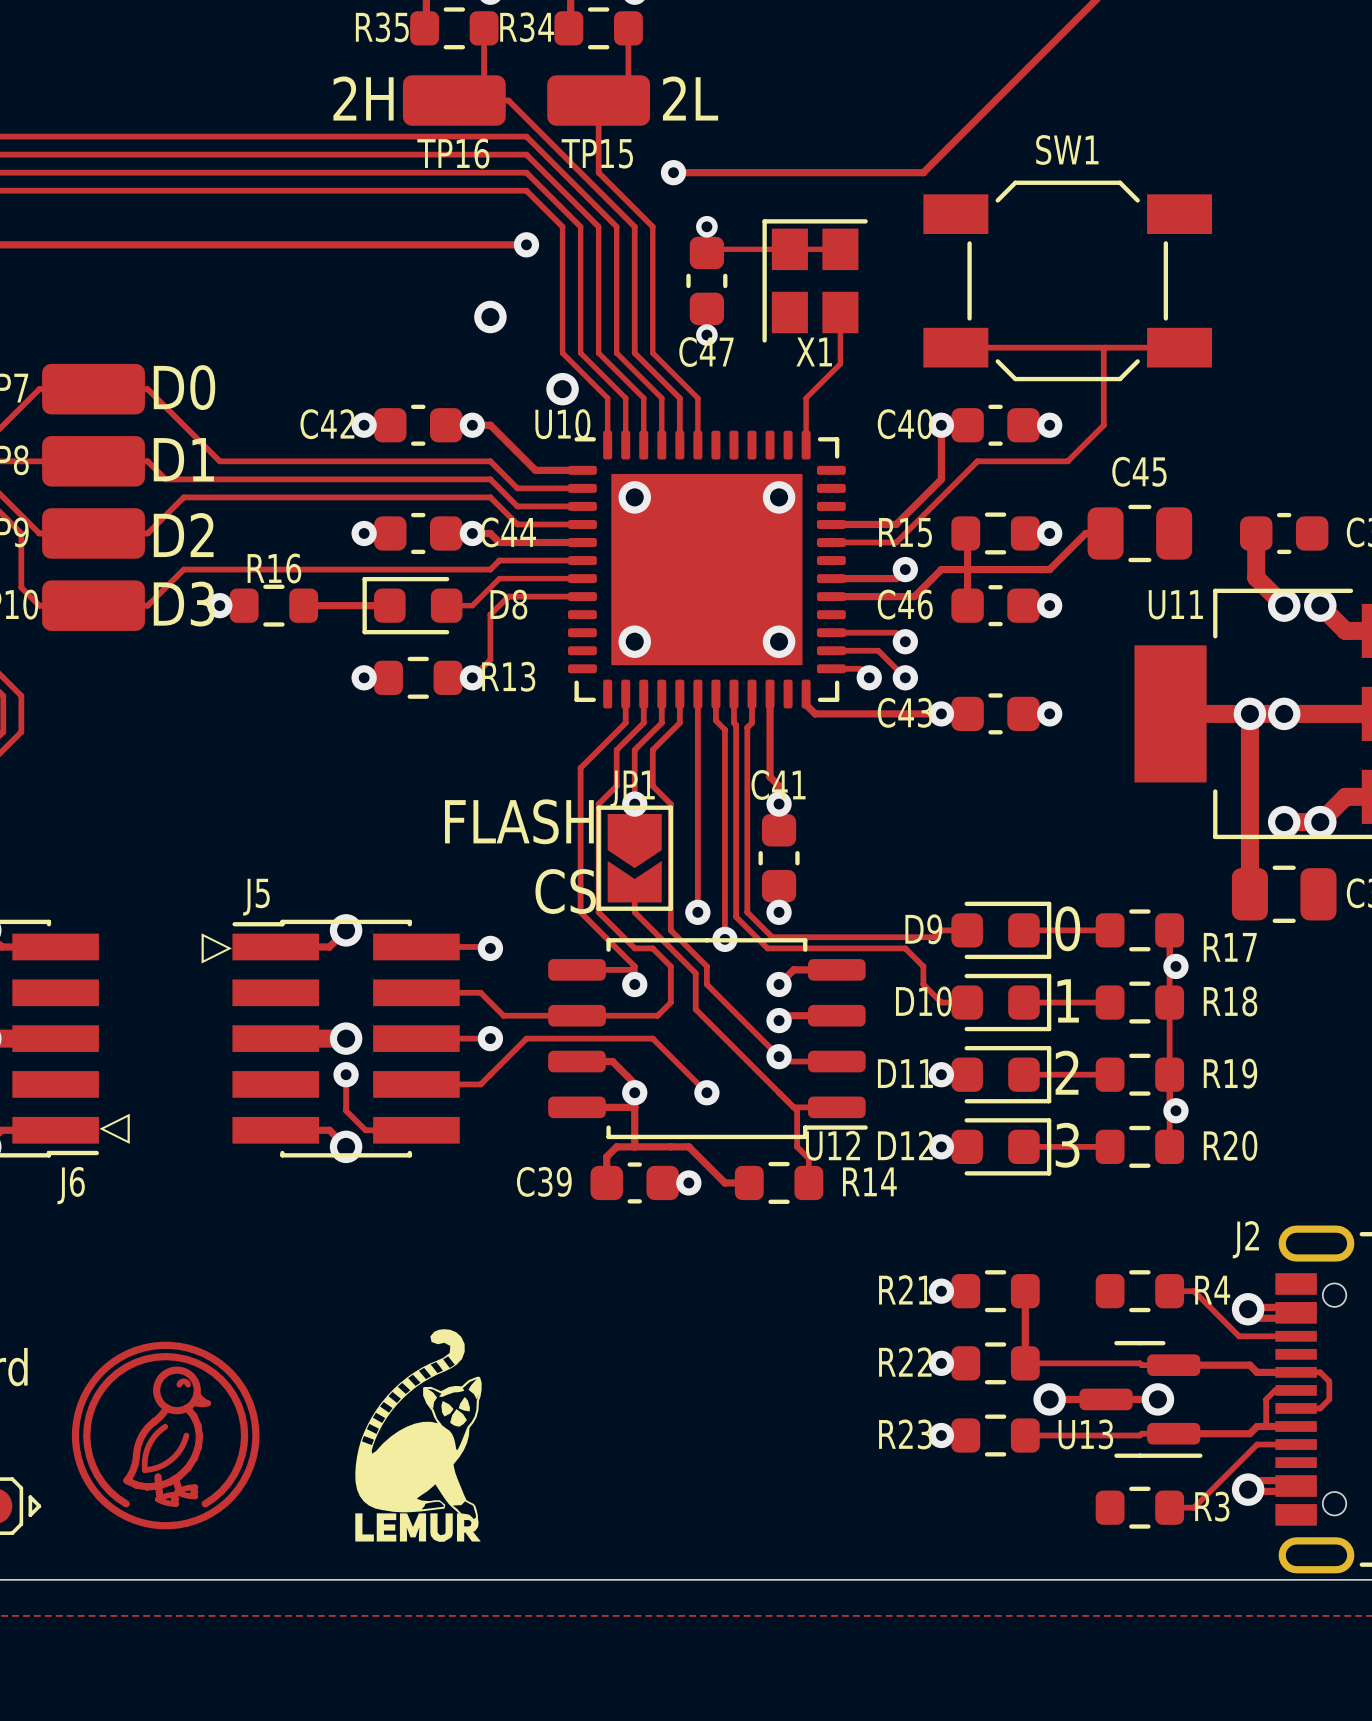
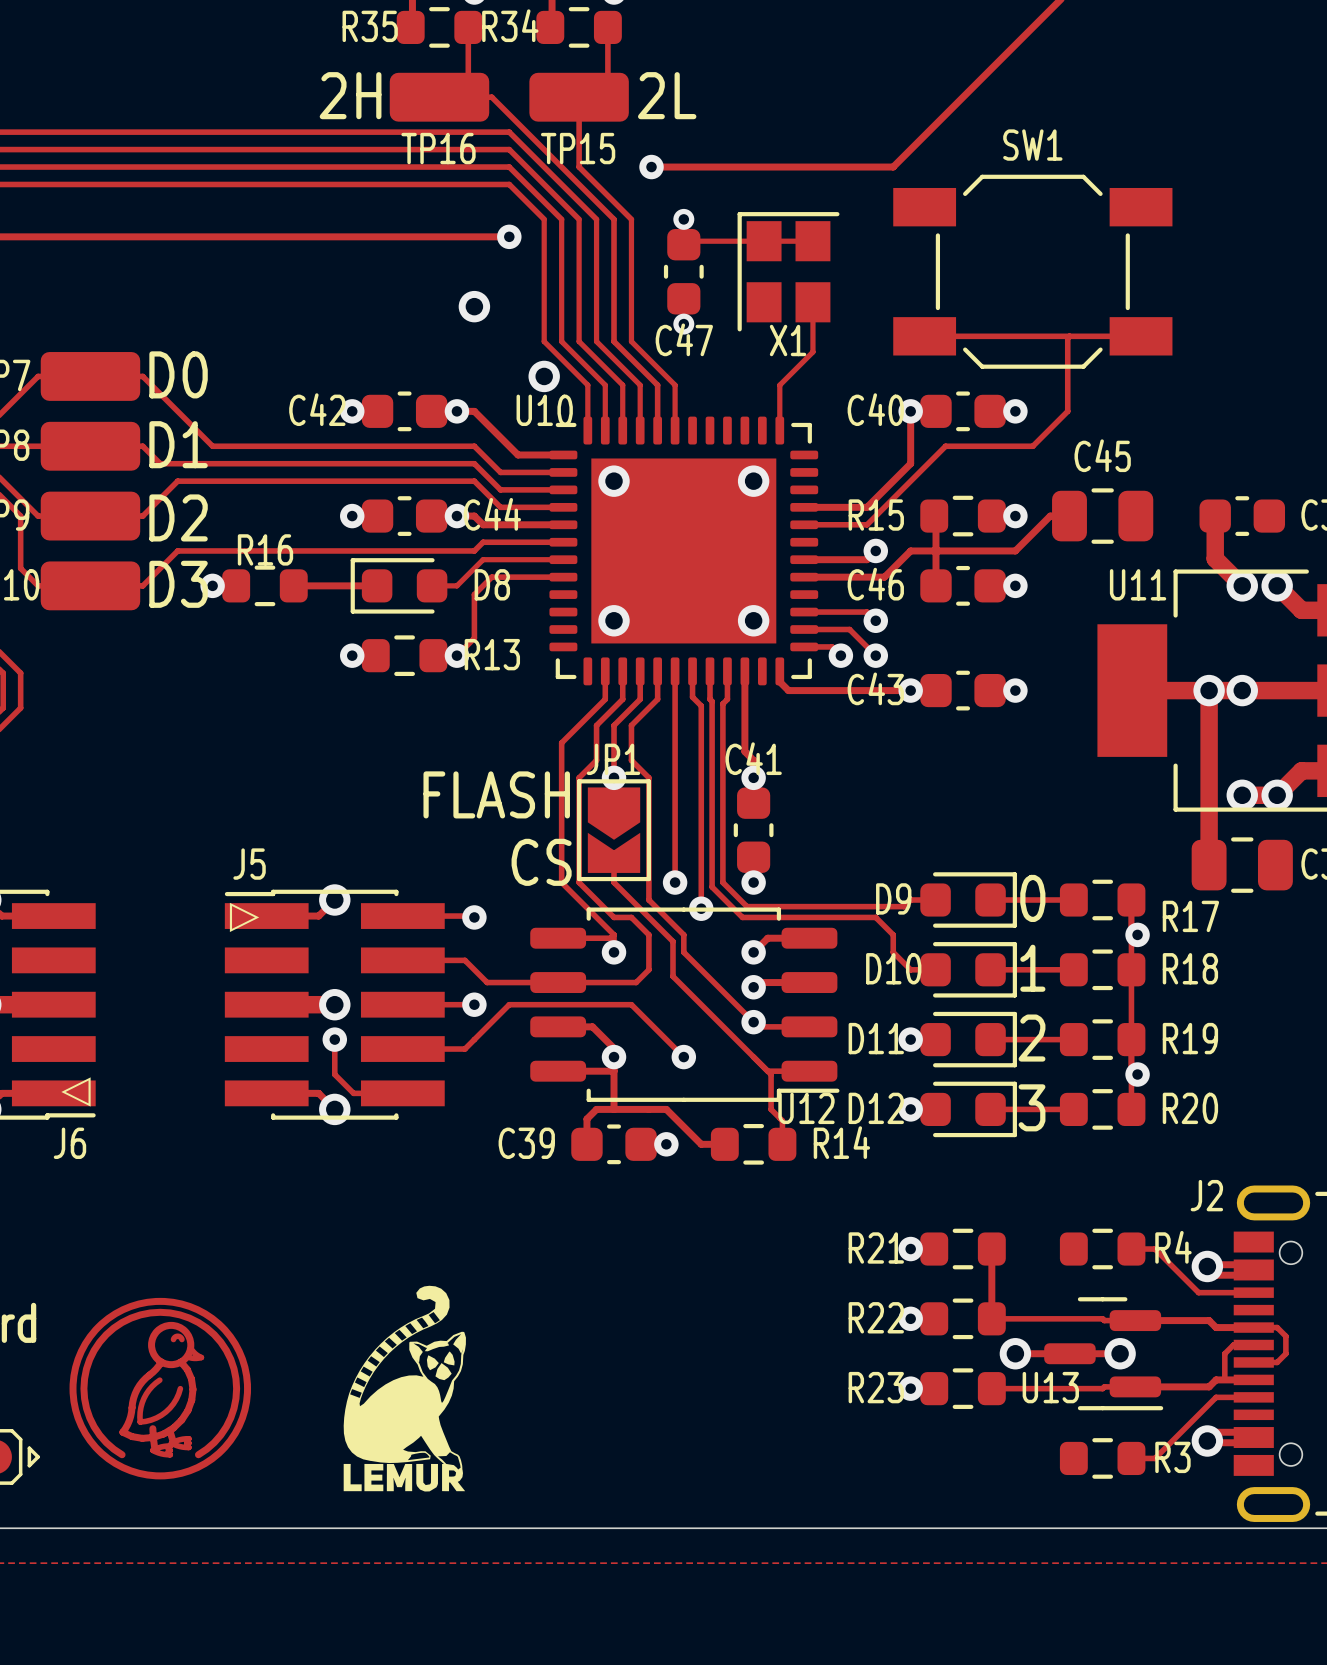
text position: △ (216, 948) -> △ (244, 917)
text position: △ (114, 1128) -> △ (75, 1091)

